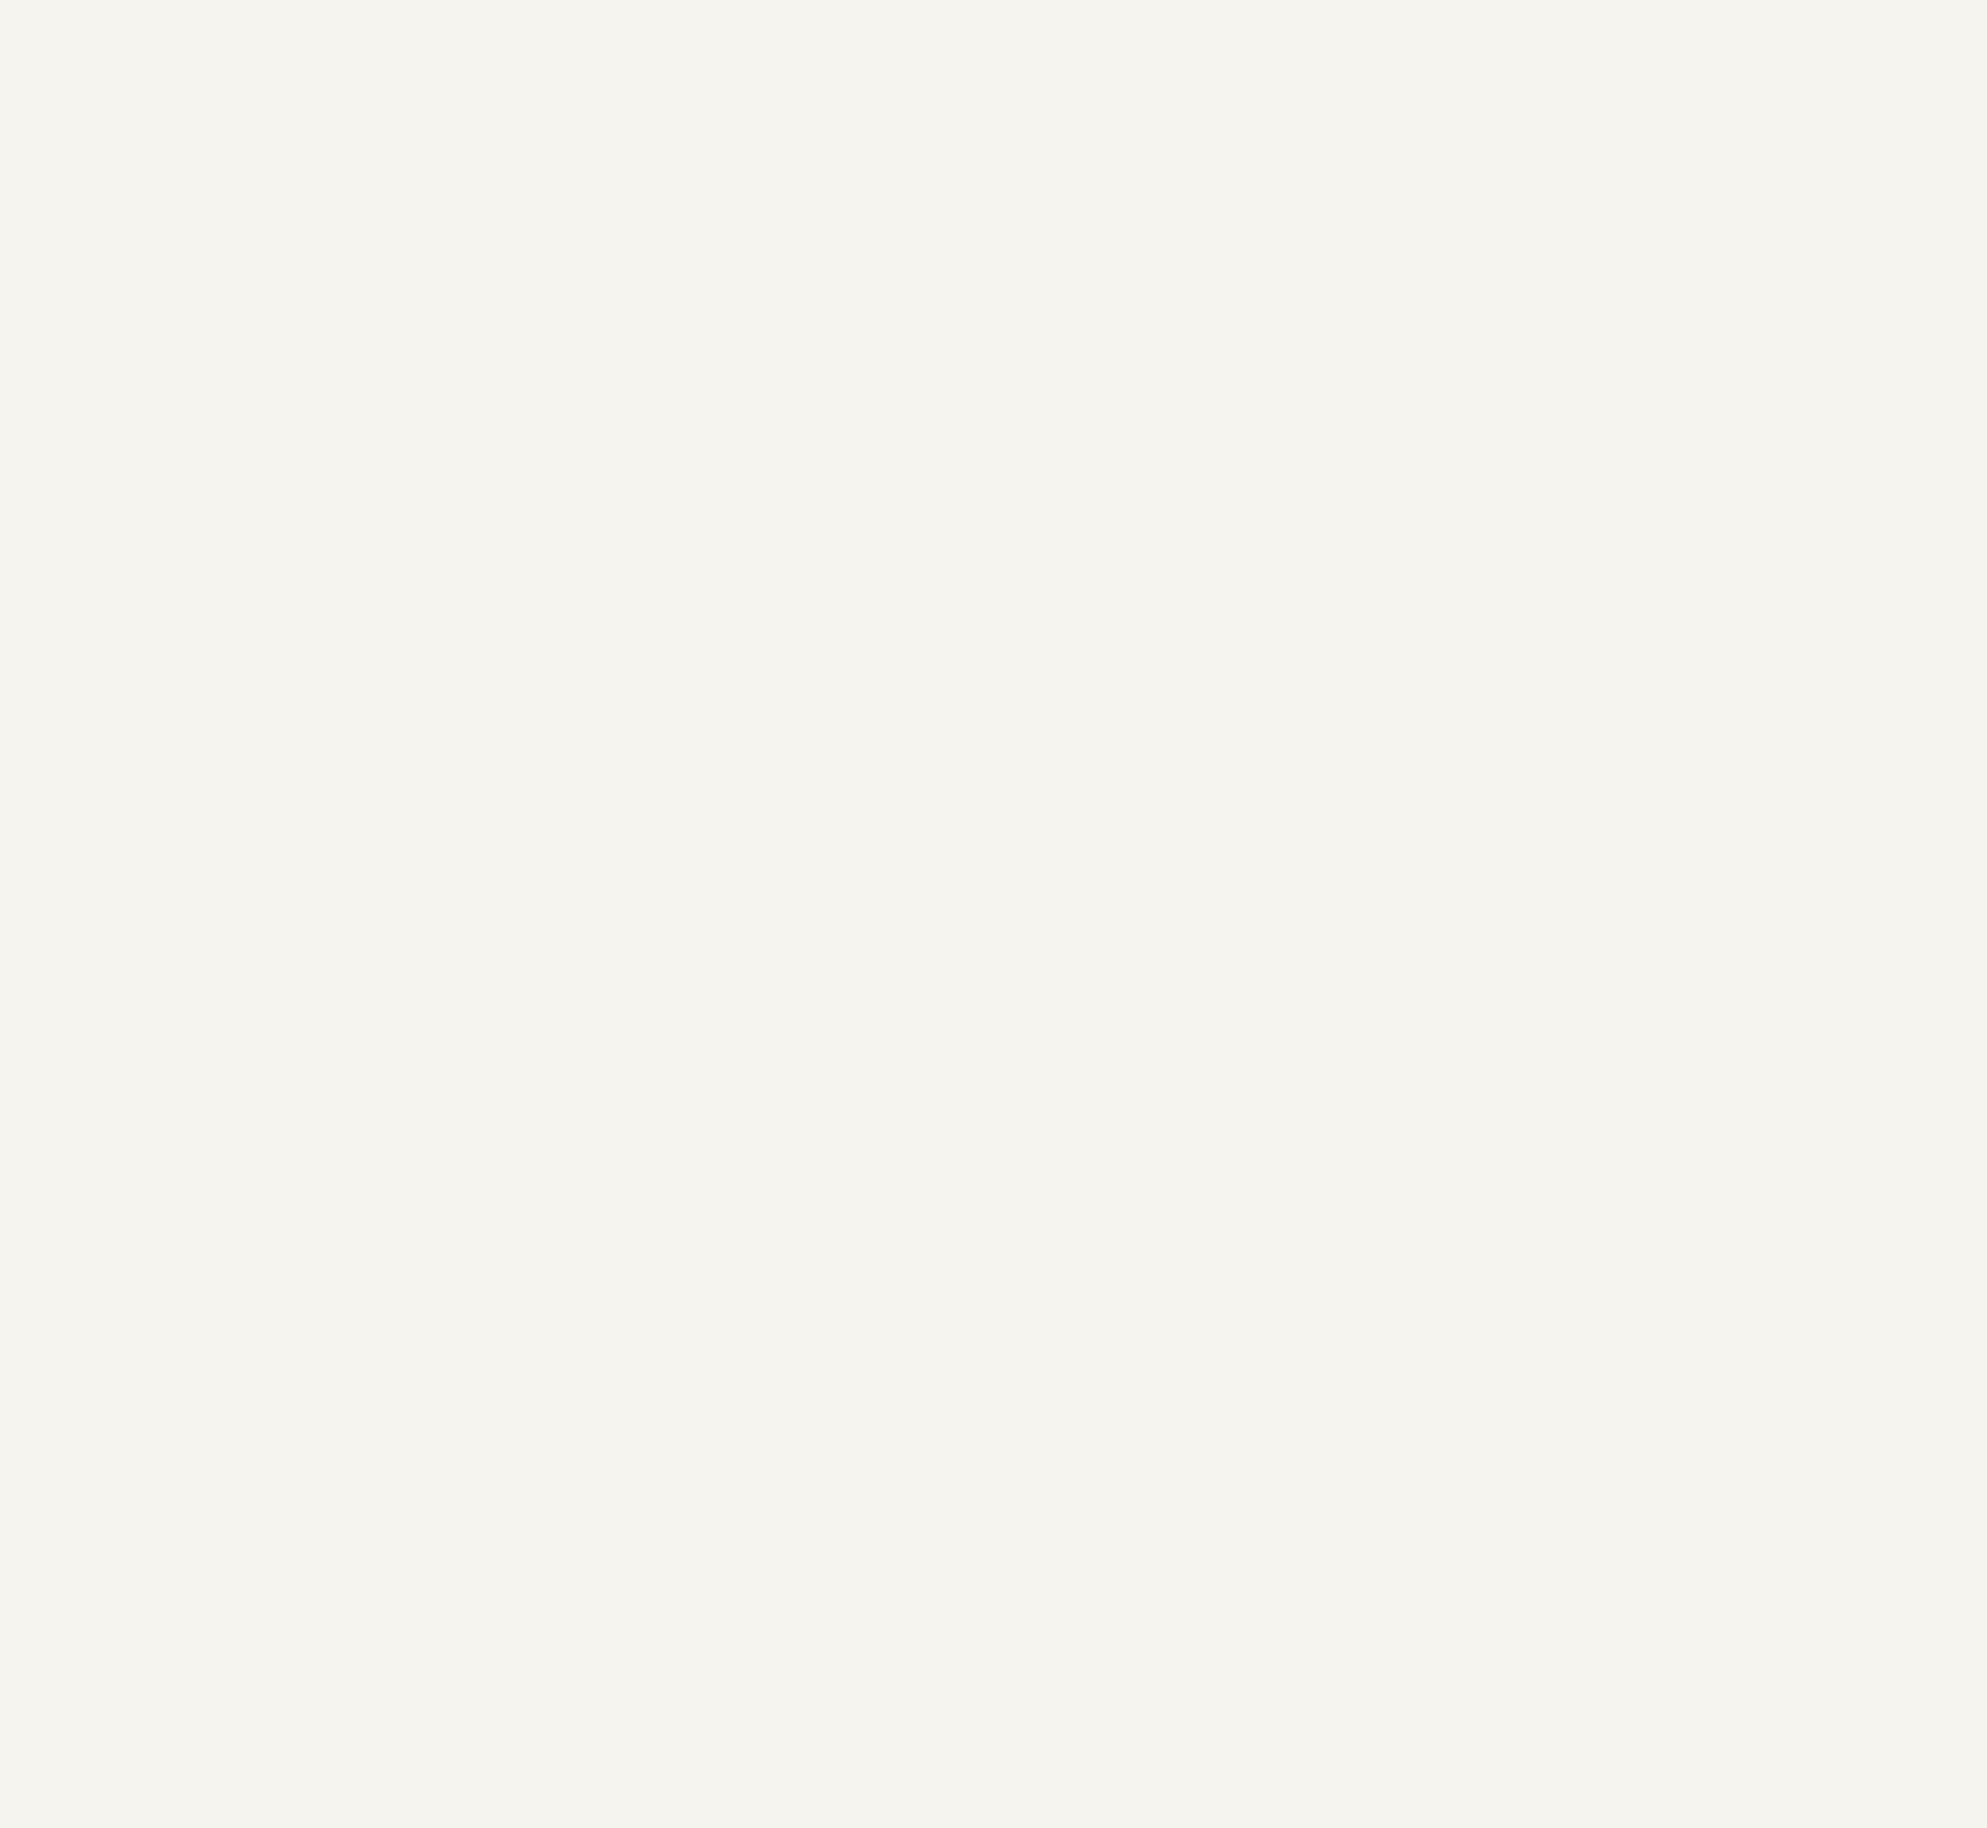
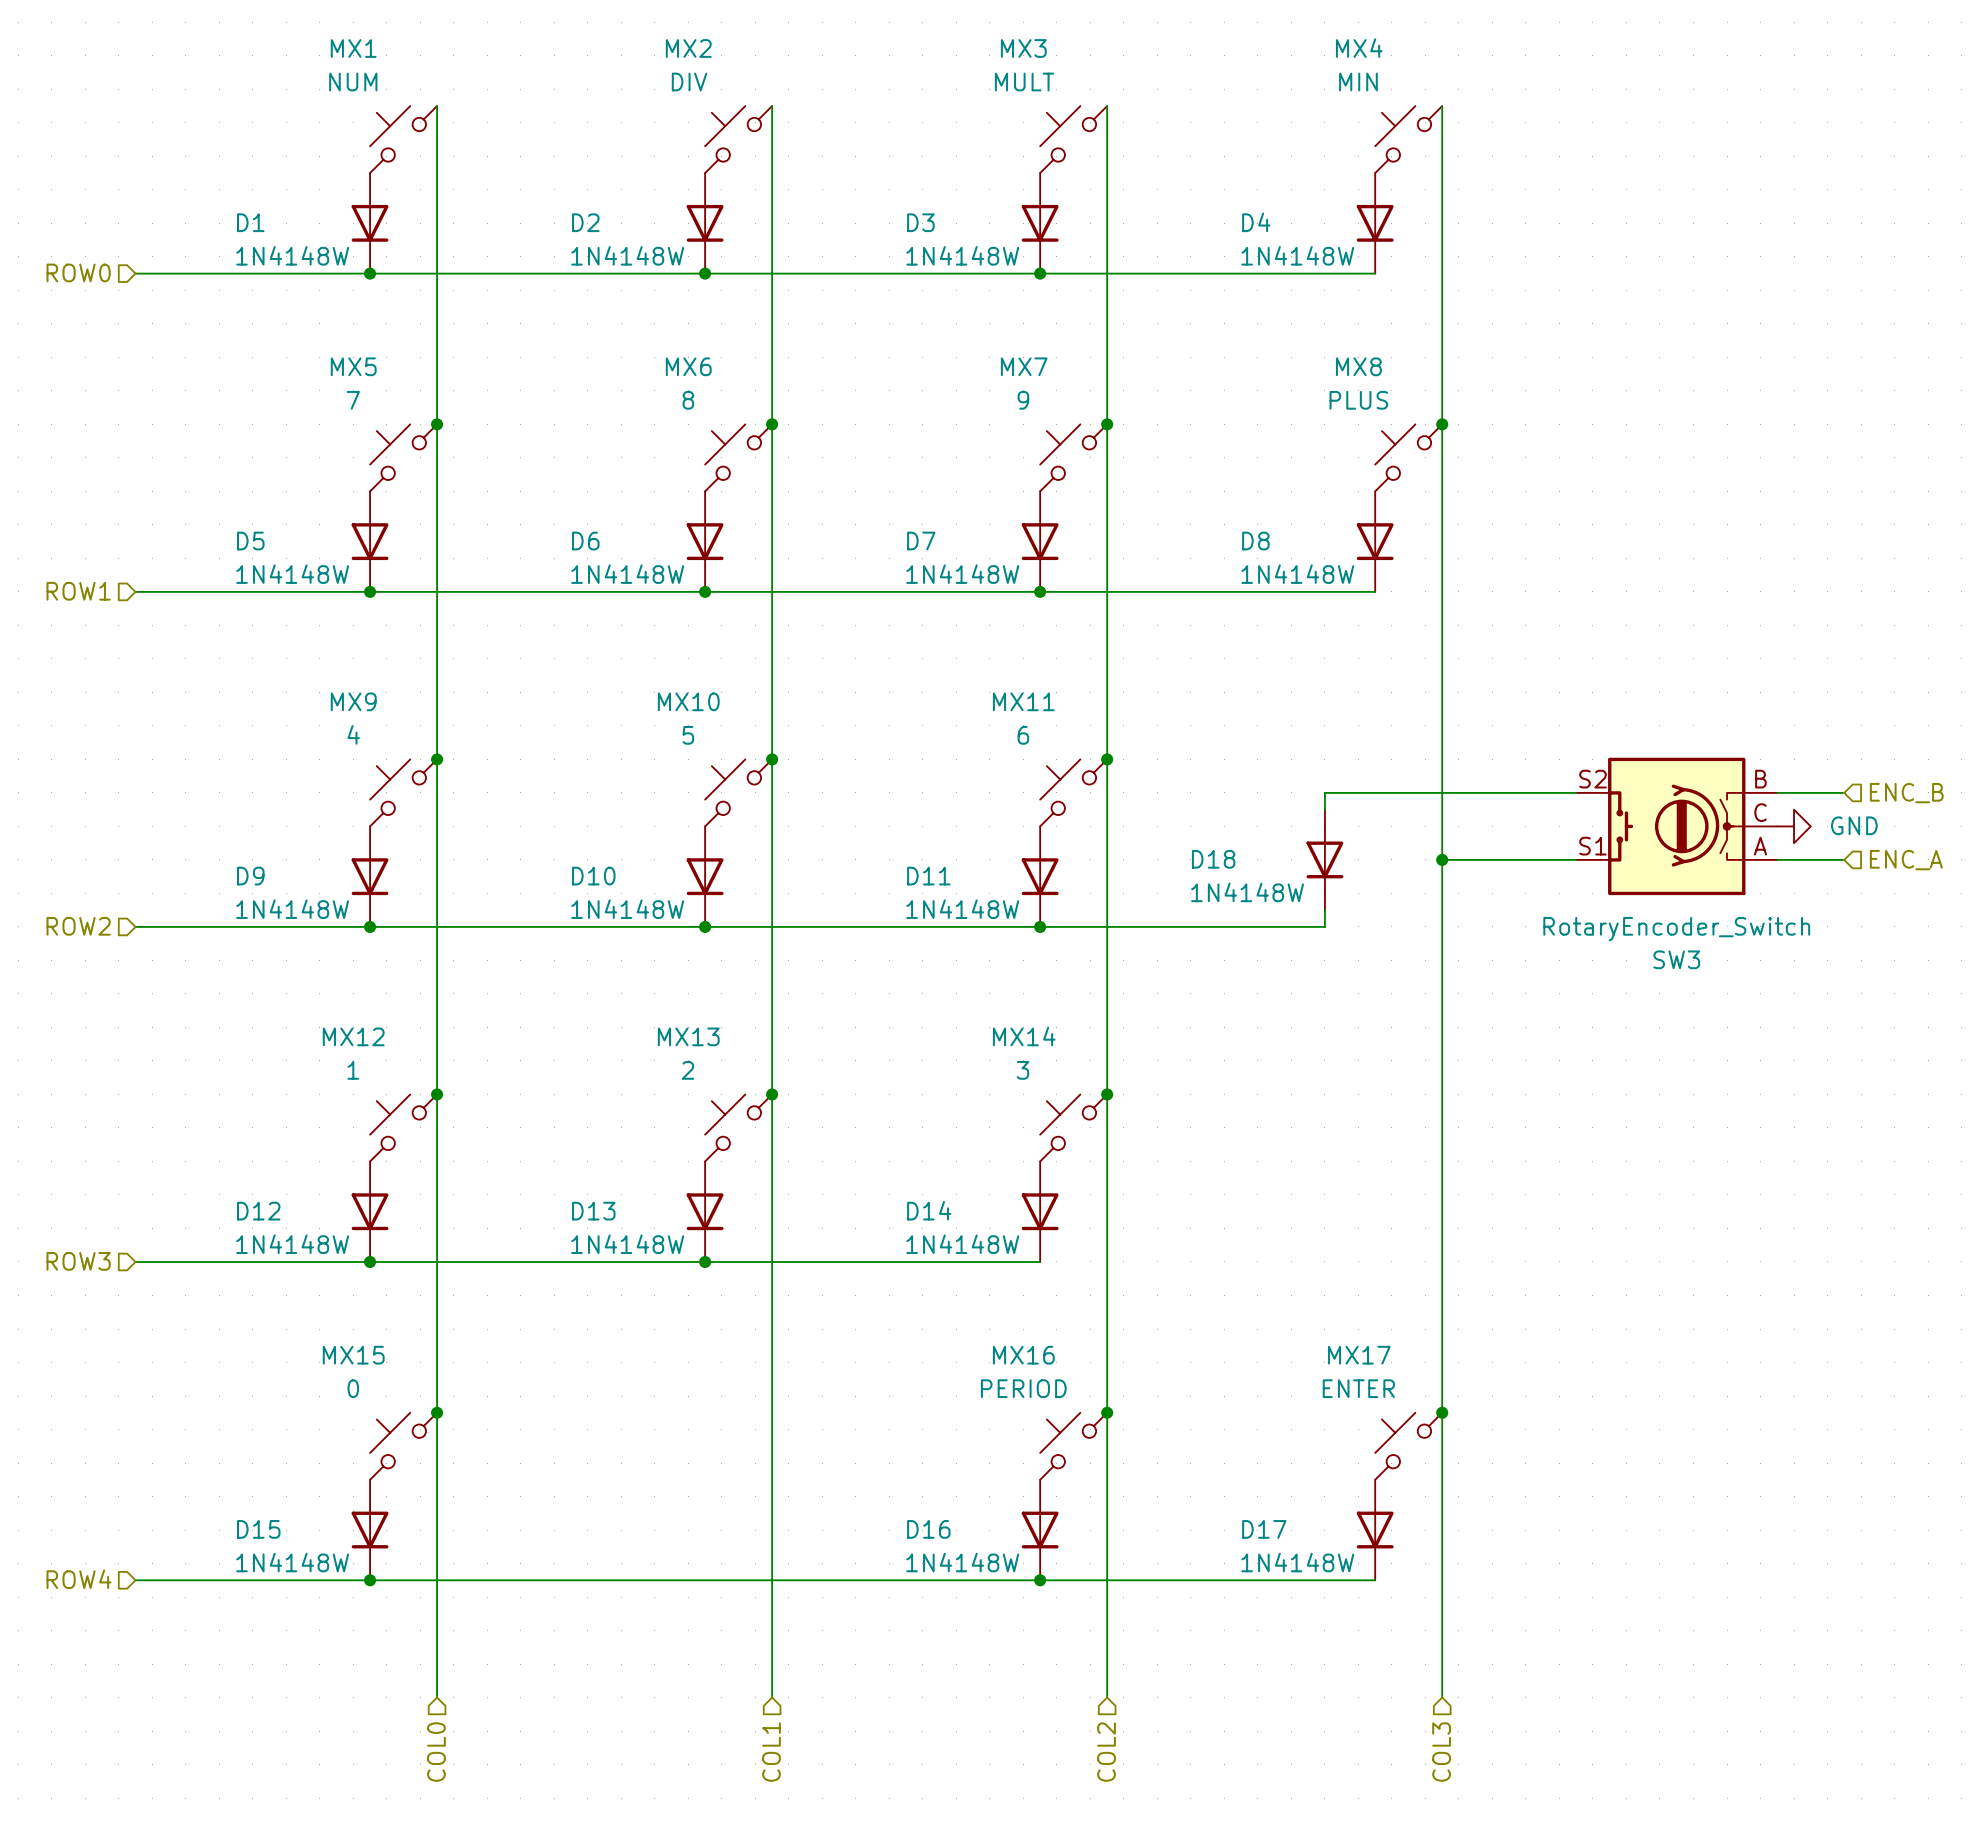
wire: none -> (437, 106) (437, 1697)
wire: none -> (772, 106) (772, 1697)
wire: none -> (1107, 106) (1107, 1697)
wire: none -> (1442, 106) (1442, 1697)
MX1: none -> NUM (403, 139)
MX2: none -> DIV (738, 139)
MX3: none -> MULT (1073, 139)
MX4: none -> MIN (1408, 139)
D1: none -> 1N4148W (370, 223)
D2: none -> 1N4148W (705, 223)
D3: none -> 1N4148W (1040, 223)
D4: none -> 1N4148W (1375, 223)
hierarchical label: none -> ROW0 (78, 272)
wire: none -> (135, 273) (1375, 273)
junction: none -> (370, 273)
junction: none -> (705, 273)
junction: none -> (1040, 273)
junction: none -> (437, 424)
junction: none -> (772, 424)
junction: none -> (1107, 424)
junction: none -> (1442, 424)
MX5: none -> 7 (403, 457)
MX6: none -> 8 (738, 457)
MX7: none -> 9 (1073, 457)
MX8: none -> PLUS (1408, 457)
D5: none -> 1N4148W (370, 541)
D6: none -> 1N4148W (705, 541)
D7: none -> 1N4148W (1040, 541)
D8: none -> 1N4148W (1375, 541)
hierarchical label: none -> ROW1 (78, 591)
wire: none -> (135, 591) (1375, 591)
junction: none -> (370, 591)
junction: none -> (705, 591)
junction: none -> (1040, 591)
junction: none -> (437, 759)
junction: none -> (772, 759)
junction: none -> (1107, 759)
MX9: none -> 4 (403, 792)
MX10: none -> 5 (738, 792)
MX11: none -> 6 (1073, 792)
wire: none -> (1576, 792) (1324, 792) (1324, 809)
wire: none -> (1777, 792) (1844, 792)
hierarchical label: none -> ENC_B (1906, 793)
SW3: none -> RotaryEncoder_Switch (1676, 826)
power symbol: none -> GND (1794, 826)
D18: none -> 1N4148W (1324, 859)
wire: none -> (1442, 859) (1576, 859)
junction: none -> (1442, 859)
wire: none -> (1777, 859) (1844, 859)
hierarchical label: none -> ENC_A (1906, 860)
D9: none -> 1N4148W (370, 876)
D10: none -> 1N4148W (705, 876)
D11: none -> 1N4148W (1040, 876)
wire: none -> (1324, 910) (1324, 926) (135, 926)
hierarchical label: none -> ROW2 (78, 926)
junction: none -> (370, 926)
junction: none -> (705, 926)
junction: none -> (1040, 926)
junction: none -> (437, 1094)
junction: none -> (772, 1094)
junction: none -> (1107, 1094)
MX12: none -> 1 (403, 1127)
MX13: none -> 2 (738, 1127)
MX14: none -> 3 (1073, 1127)
D12: none -> 1N4148W (370, 1211)
D13: none -> 1N4148W (705, 1211)
D14: none -> 1N4148W (1040, 1211)
hierarchical label: none -> ROW3 (78, 1261)
wire: none -> (135, 1261) (1040, 1261)
junction: none -> (370, 1261)
junction: none -> (705, 1261)
junction: none -> (437, 1412)
junction: none -> (1107, 1412)
junction: none -> (1442, 1412)
MX15: none -> 0 (403, 1446)
MX16: none -> PERIOD (1073, 1446)
MX17: none -> ENTER (1408, 1446)
D15: none -> 1N4148W (370, 1530)
D16: none -> 1N4148W (1040, 1530)
D17: none -> 1N4148W (1375, 1530)
hierarchical label: none -> ROW4 (79, 1579)
wire: none -> (135, 1580) (1375, 1580)
junction: none -> (370, 1580)
junction: none -> (1040, 1580)
hierarchical label: none -> COL0 (436, 1752)
hierarchical label: none -> COL1 (771, 1752)
hierarchical label: none -> COL2 (1106, 1752)
hierarchical label: none -> COL3 (1441, 1752)

